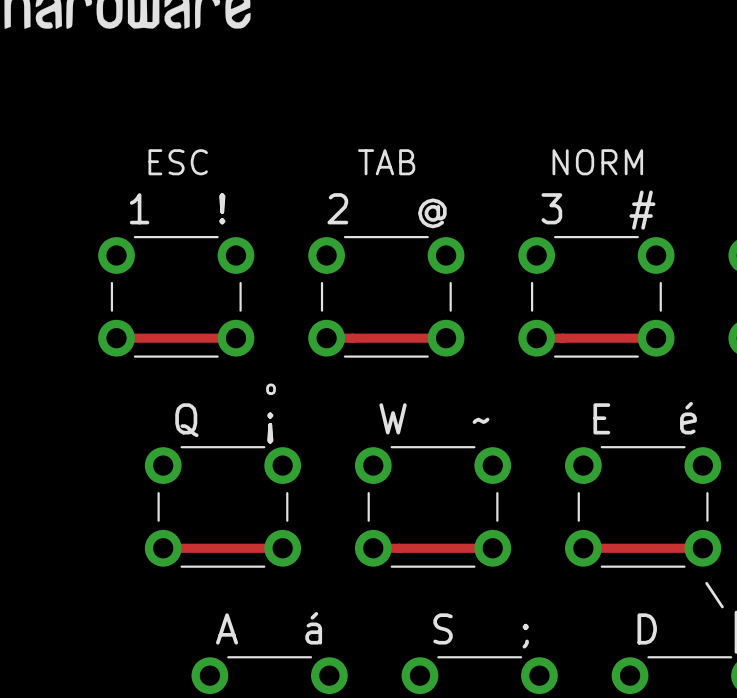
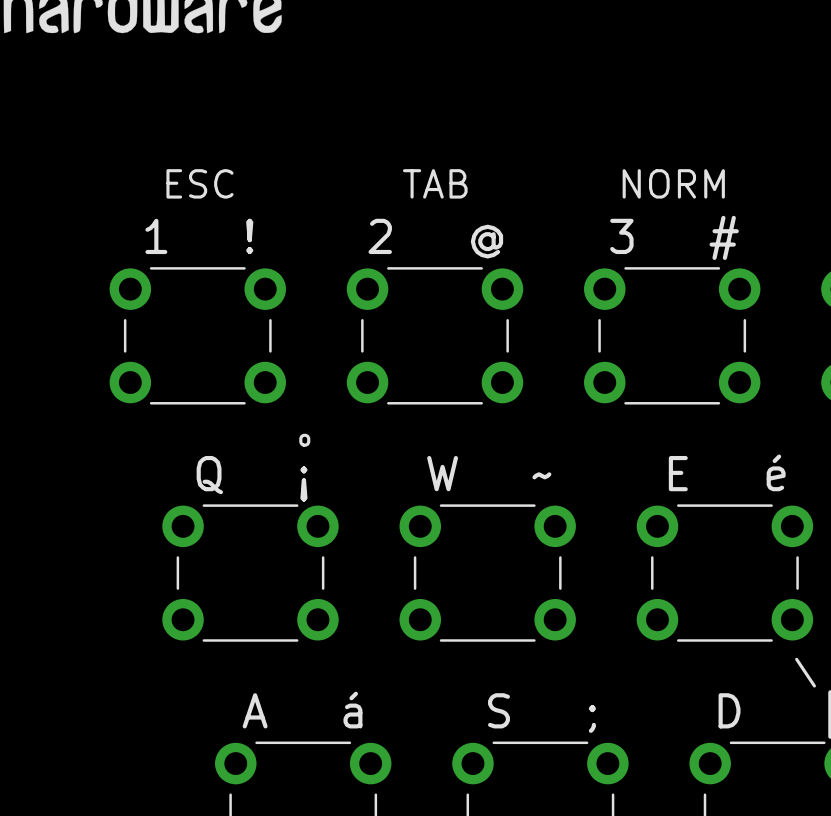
track: (116, 338) (236, 338) -> none
track: (326, 338) (446, 338) -> none
track: (536, 338) (656, 338) -> none
track: (163, 548) (282, 548) -> none
track: (373, 548) (492, 548) -> none
track: (583, 548) (702, 548) -> none

